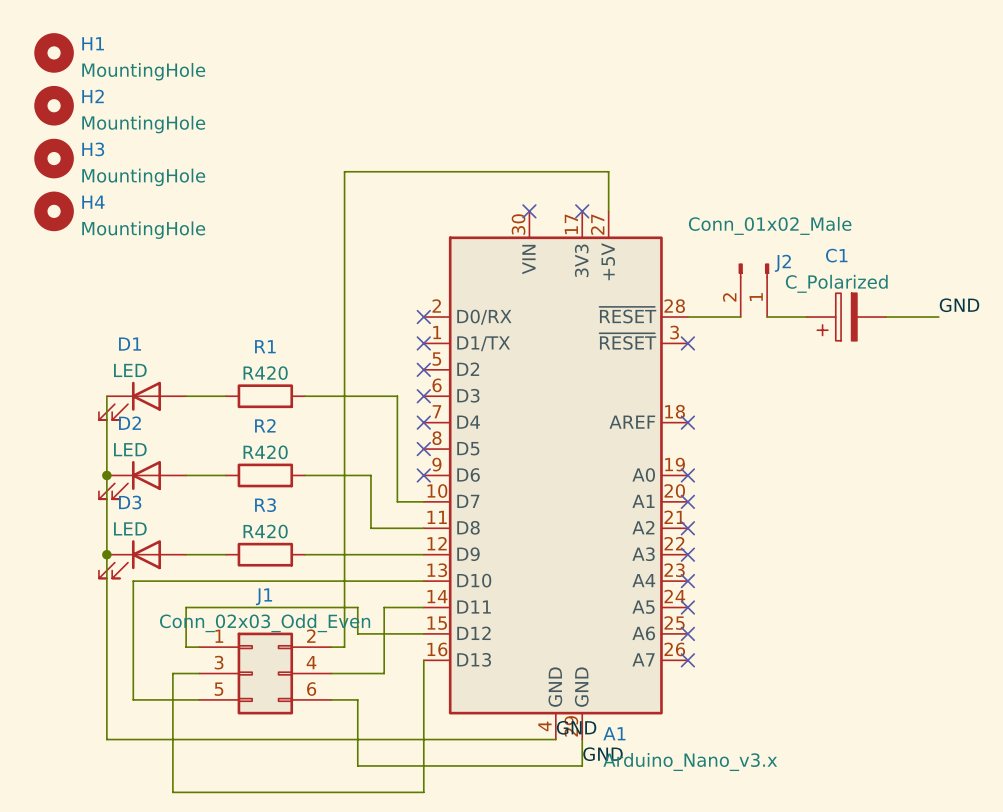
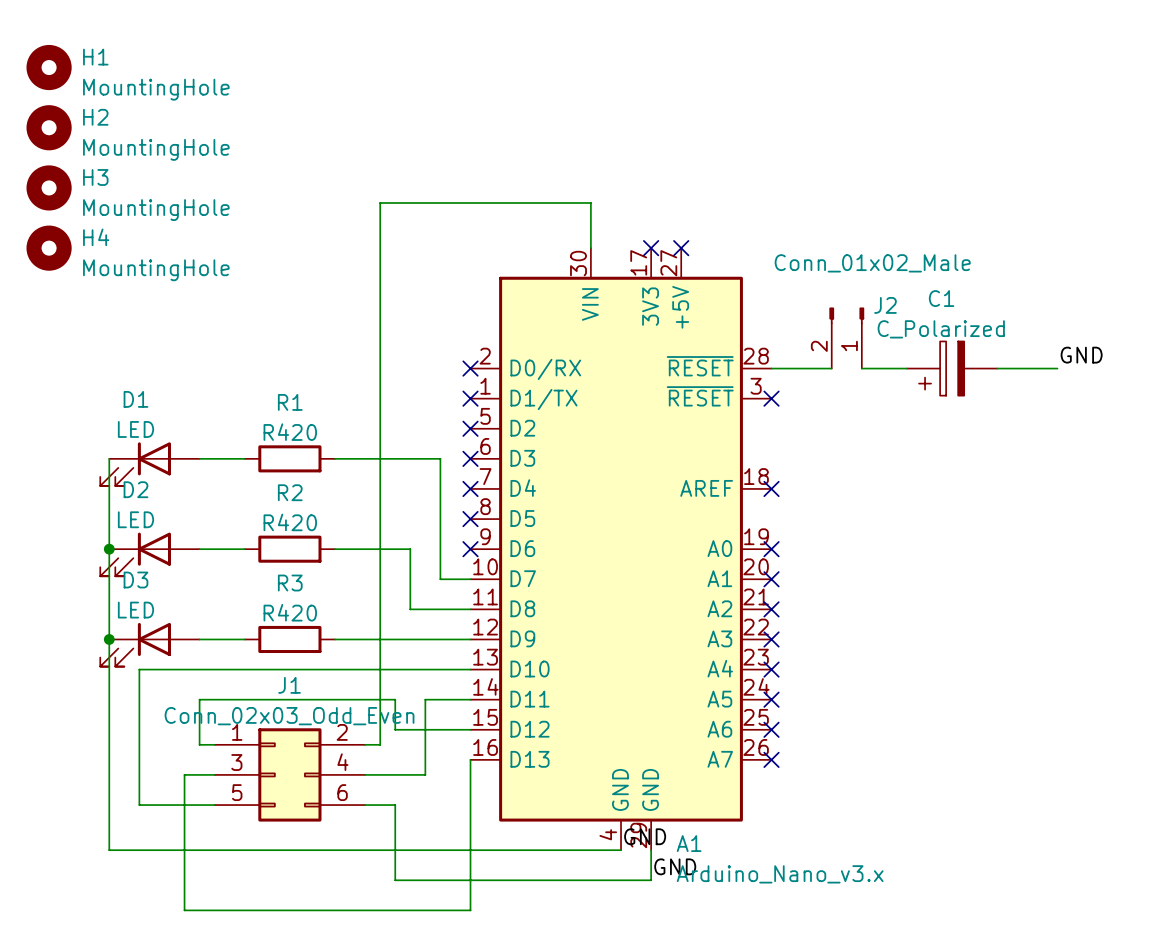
wire: (529, 171) (608, 171) (608, 211) -> (590, 202) (590, 248)
no-connect mark: (529, 211) -> none
no-connect mark: none -> (681, 248)

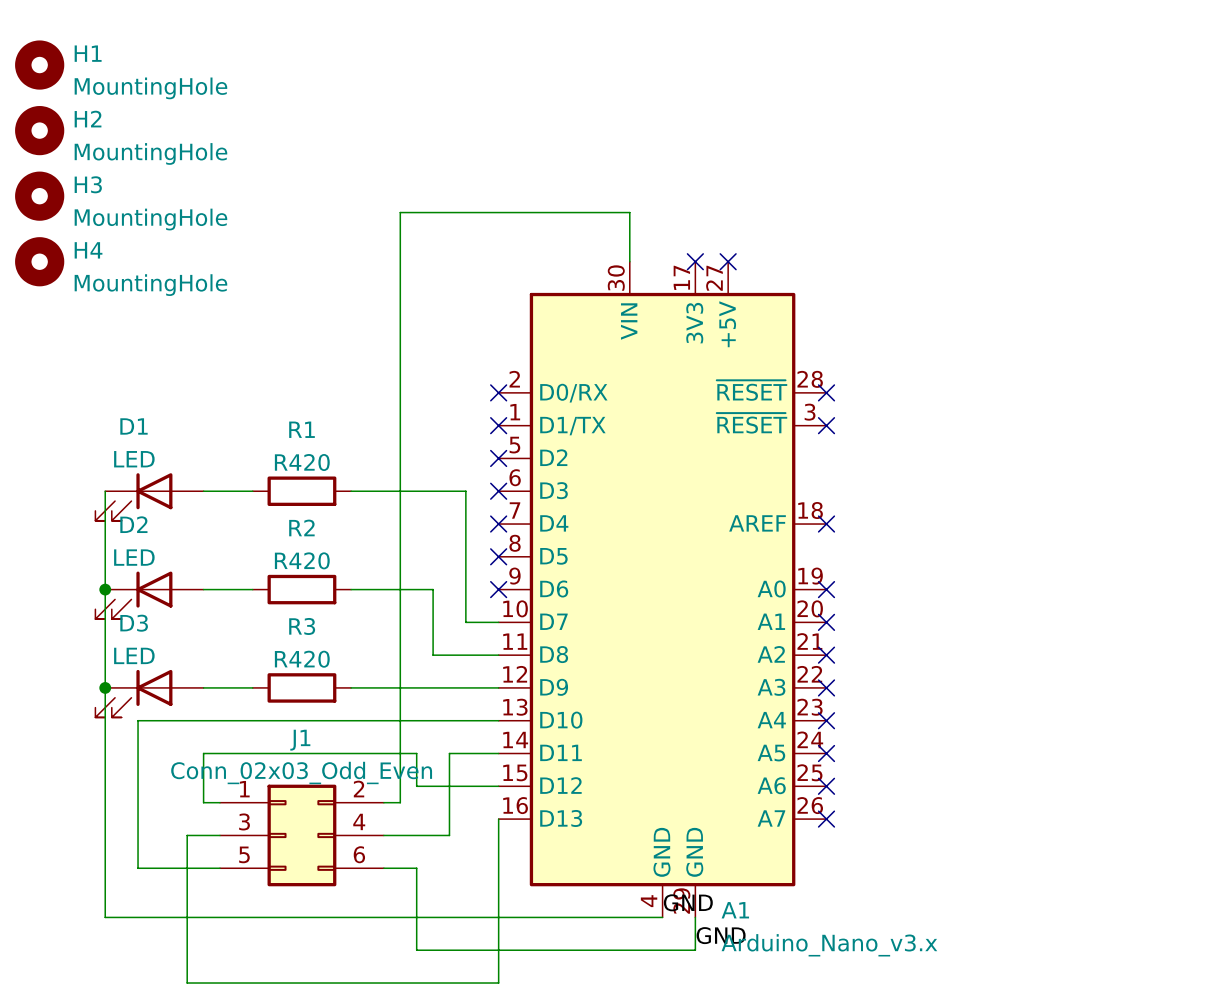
J2: Conn_01x02_Male (846, 338) -> none
label: GND (1081, 355) -> none
wire: (771, 368) (831, 368) -> none
no-connect mark: none -> (826, 392)
wire: (861, 368) (906, 368) -> none
C1: C_Polarized (952, 368) -> none
wire: (997, 368) (1057, 368) -> none

